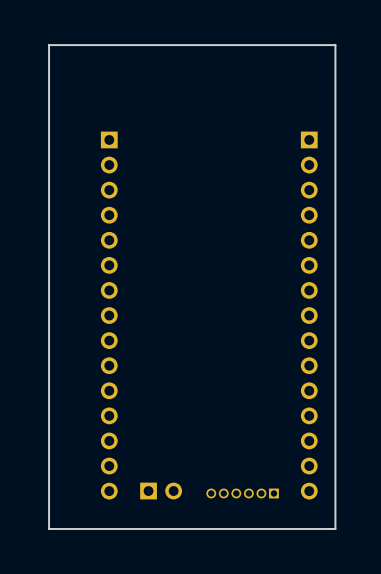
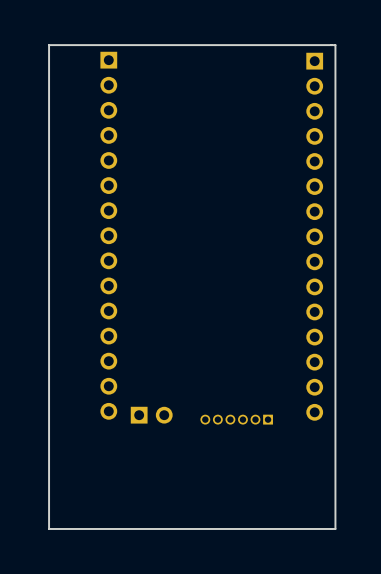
part position: (109, 315) -> (108, 235)
part position: (309, 315) -> (314, 236)
part position: (161, 491) -> (151, 415)
part position: (242, 493) -> (236, 419)

